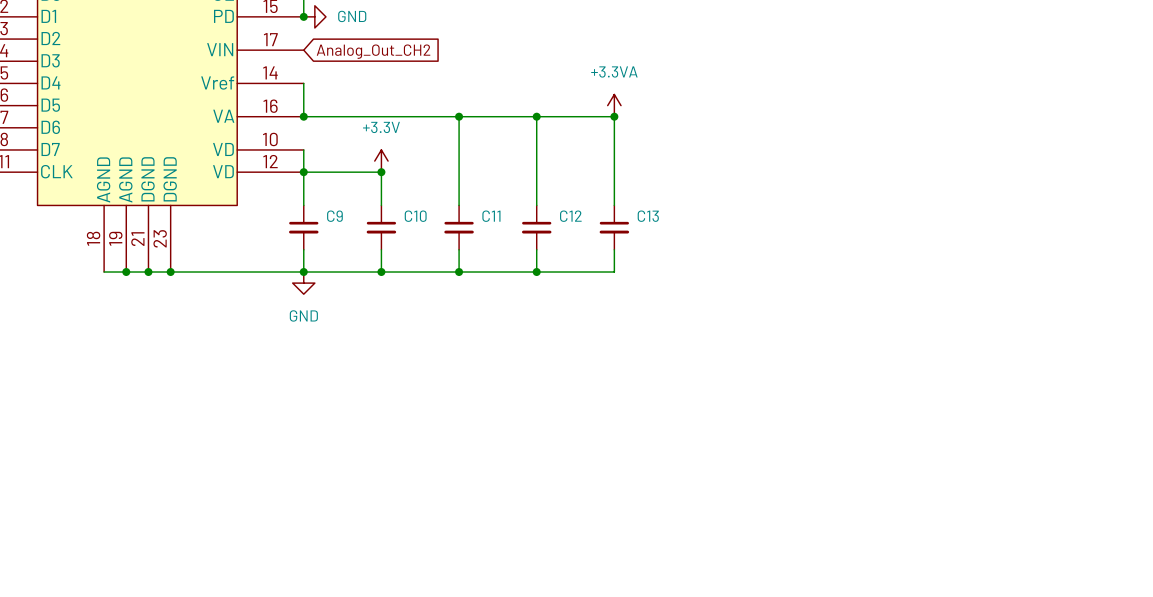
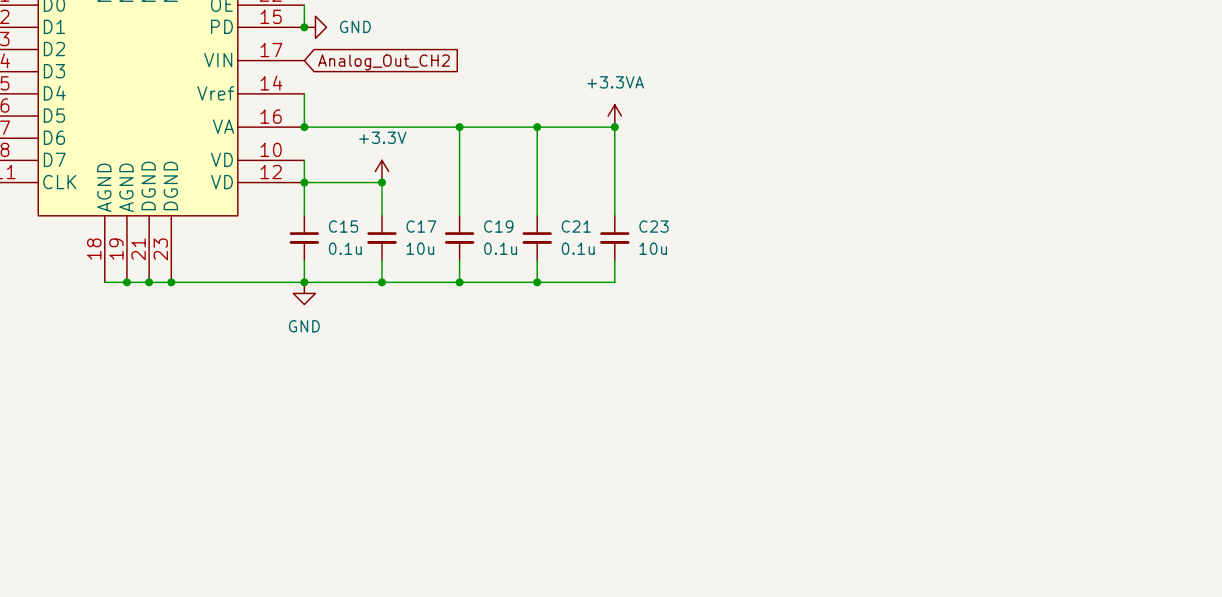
C9 name: C9 (334, 216) -> C15 (343, 226)
C10 name: C10 (415, 216) -> C17 (421, 226)
C11 name: C11 (491, 216) -> C19 (498, 226)
C12 name: C12 (570, 216) -> C21 (576, 226)
C13 name: C13 (648, 216) -> C23 (653, 226)
C9 value: none -> 0.1u (345, 248)
C10 value: none -> 10u (420, 248)
C11 value: none -> 0.1u (500, 248)
C12 value: none -> 0.1u (578, 248)
C13 value: none -> 10u (653, 248)

